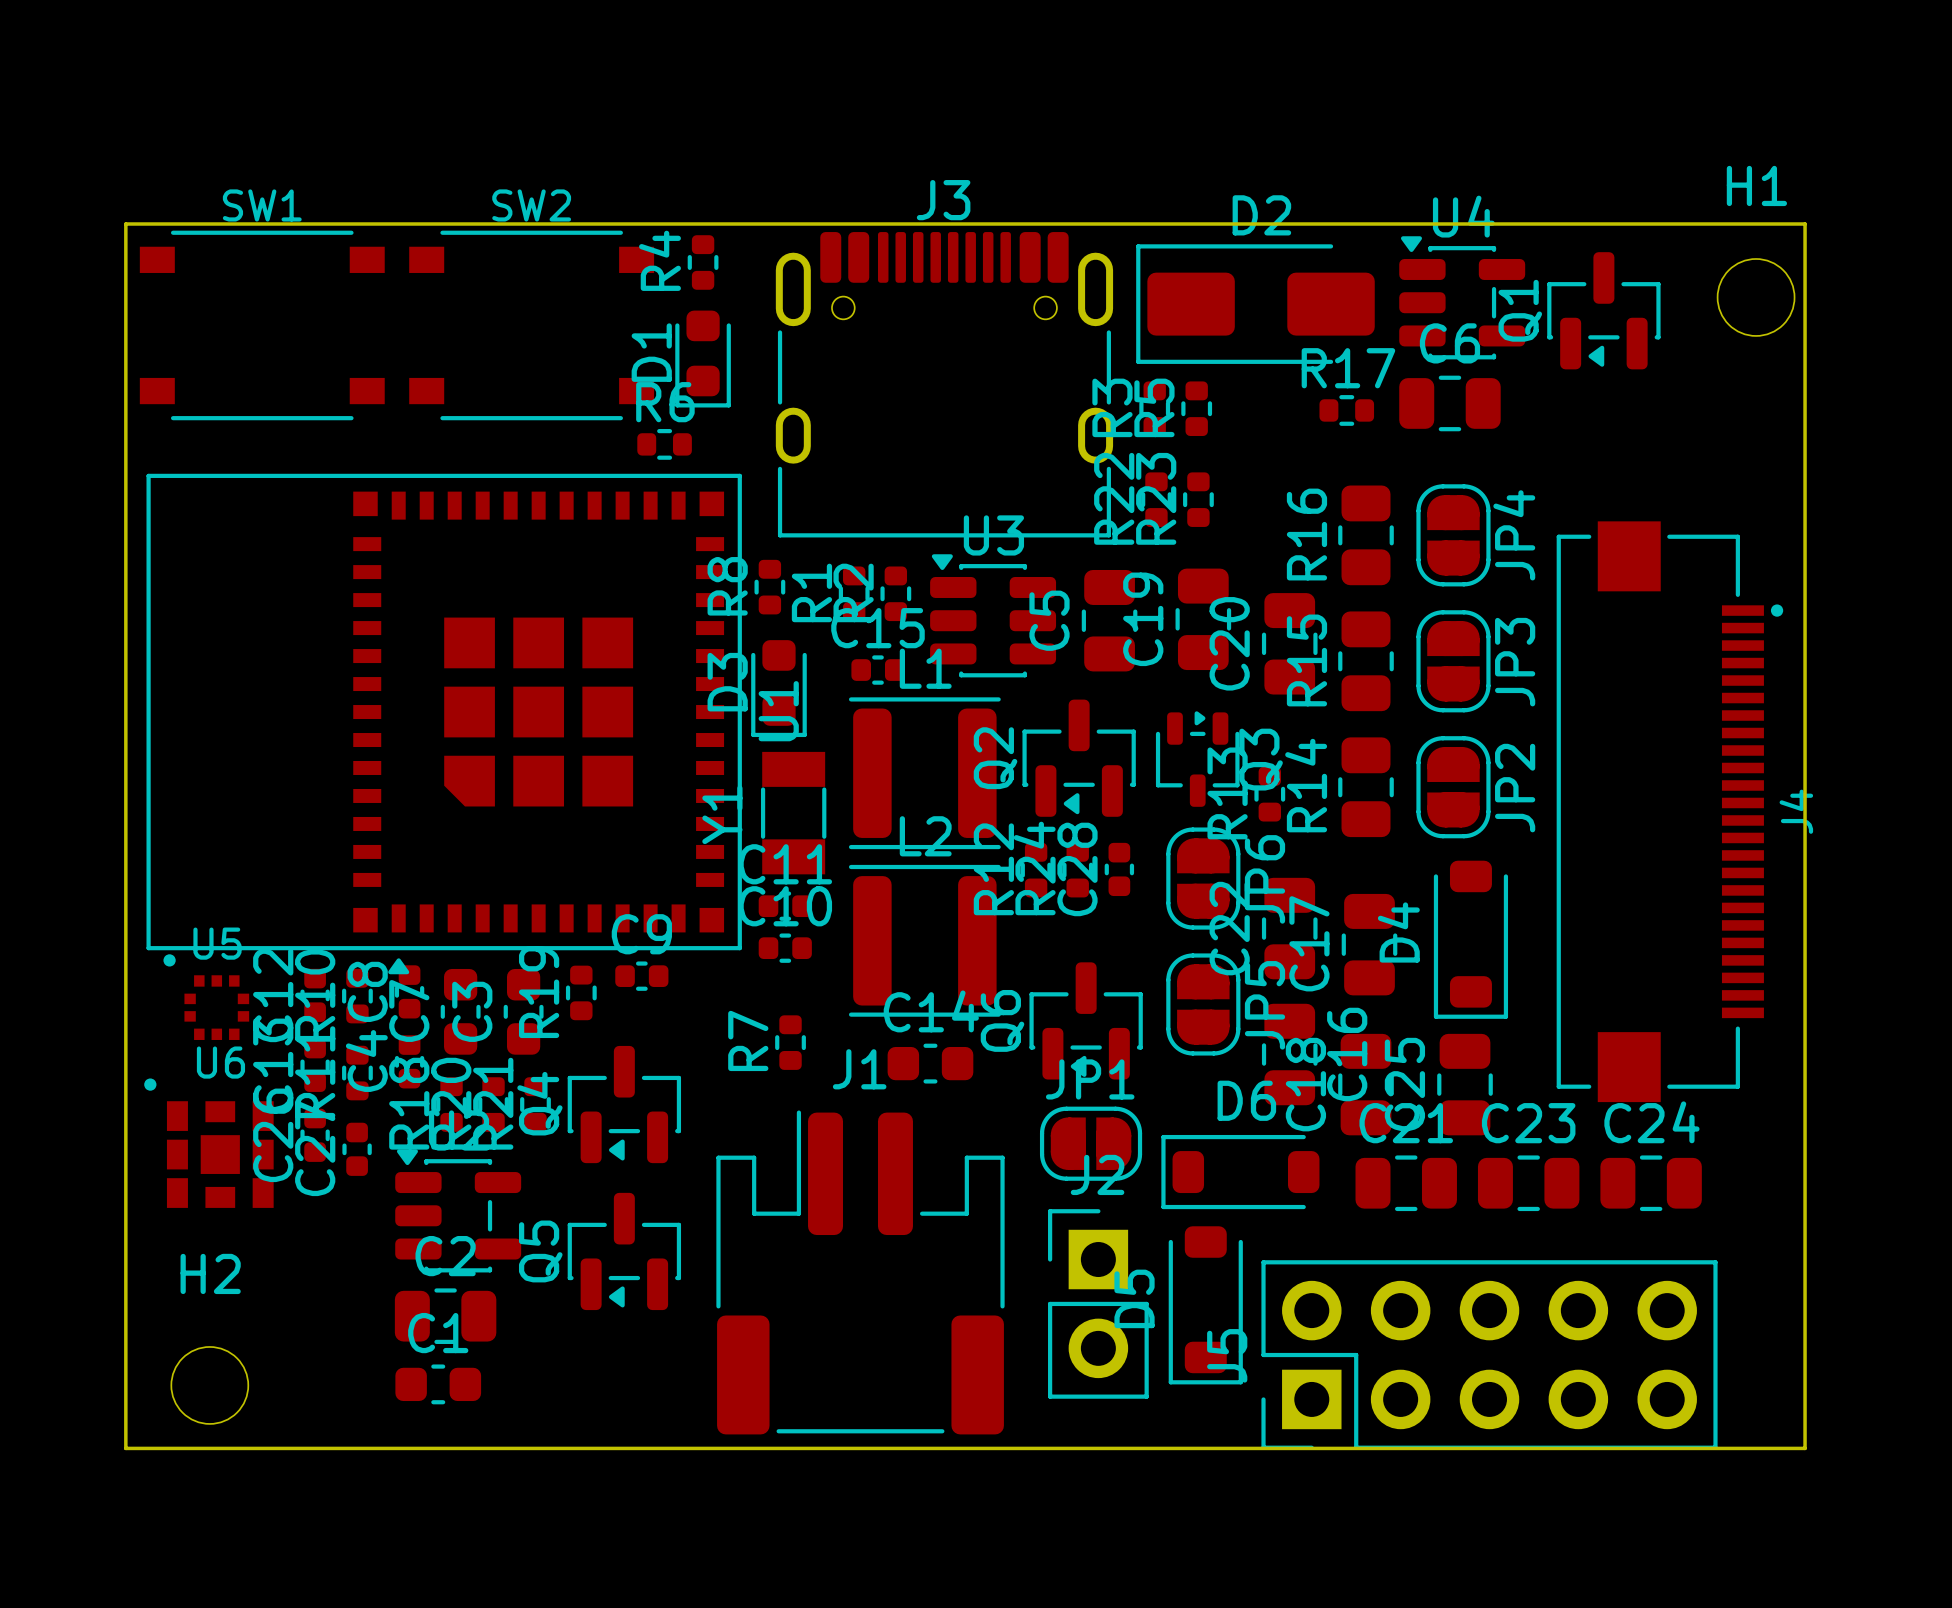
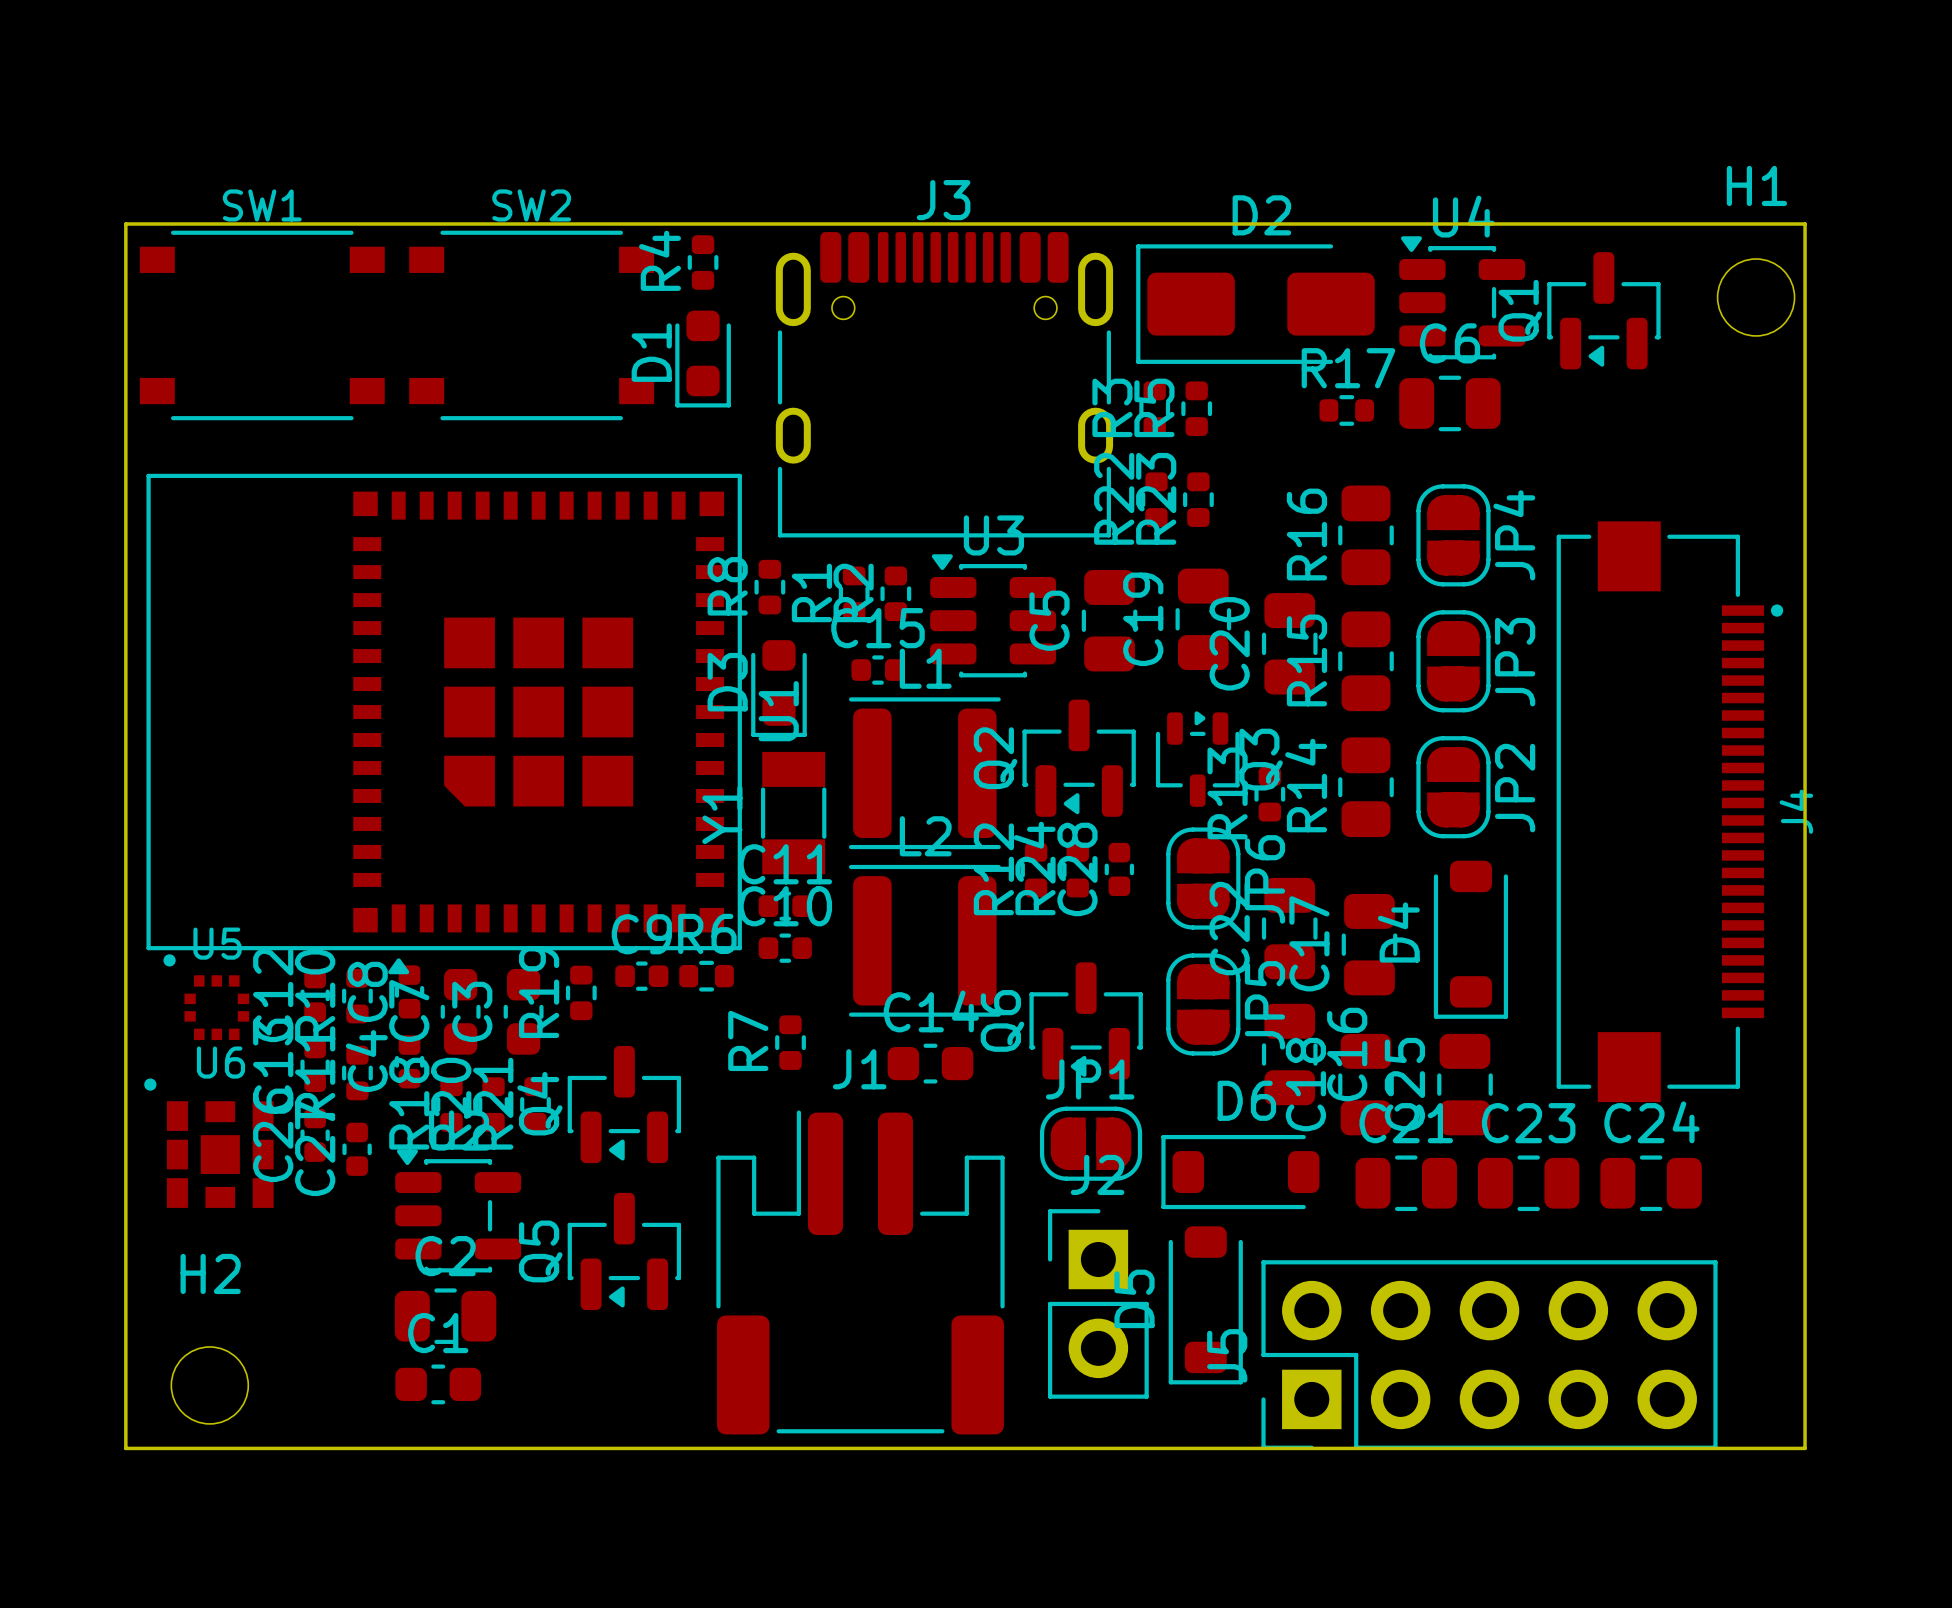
R6 position: (664, 444) -> (706, 976)

